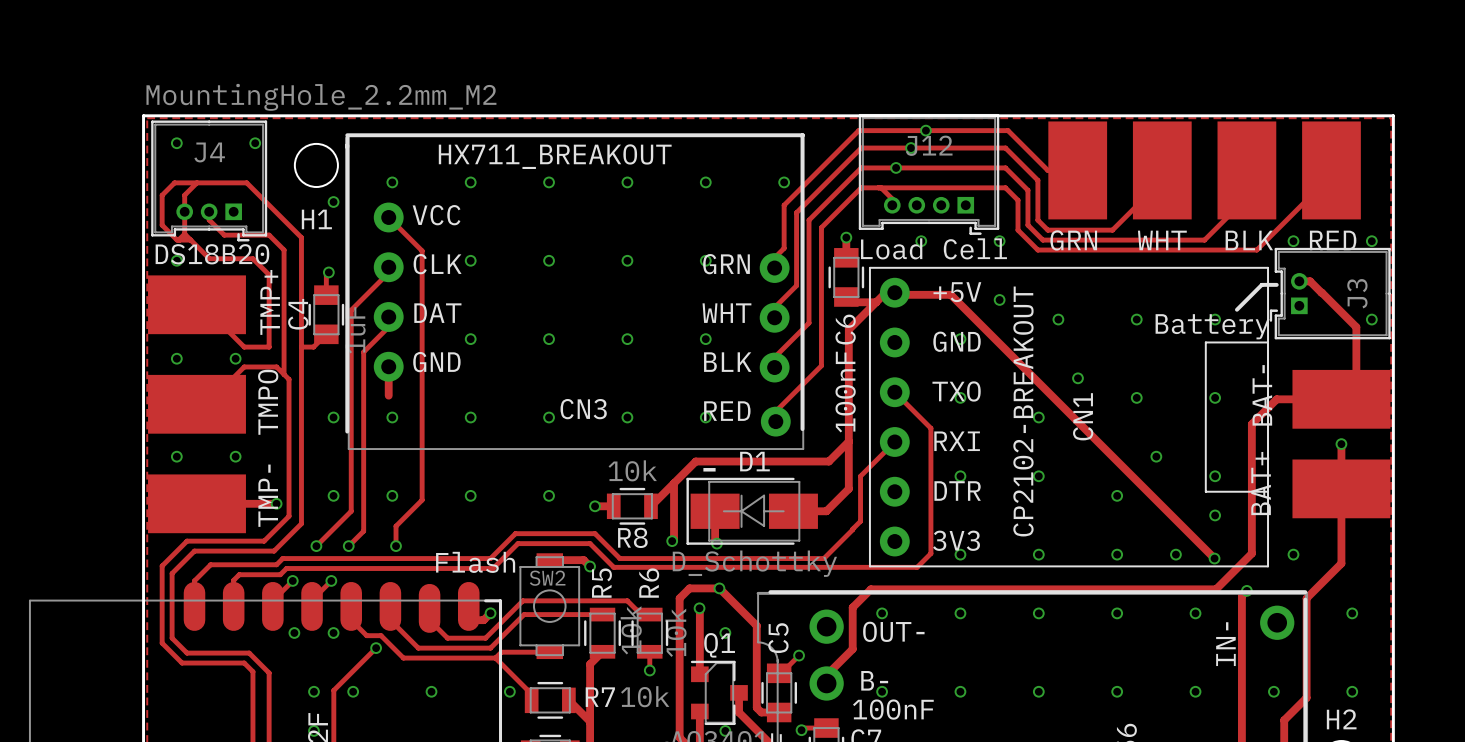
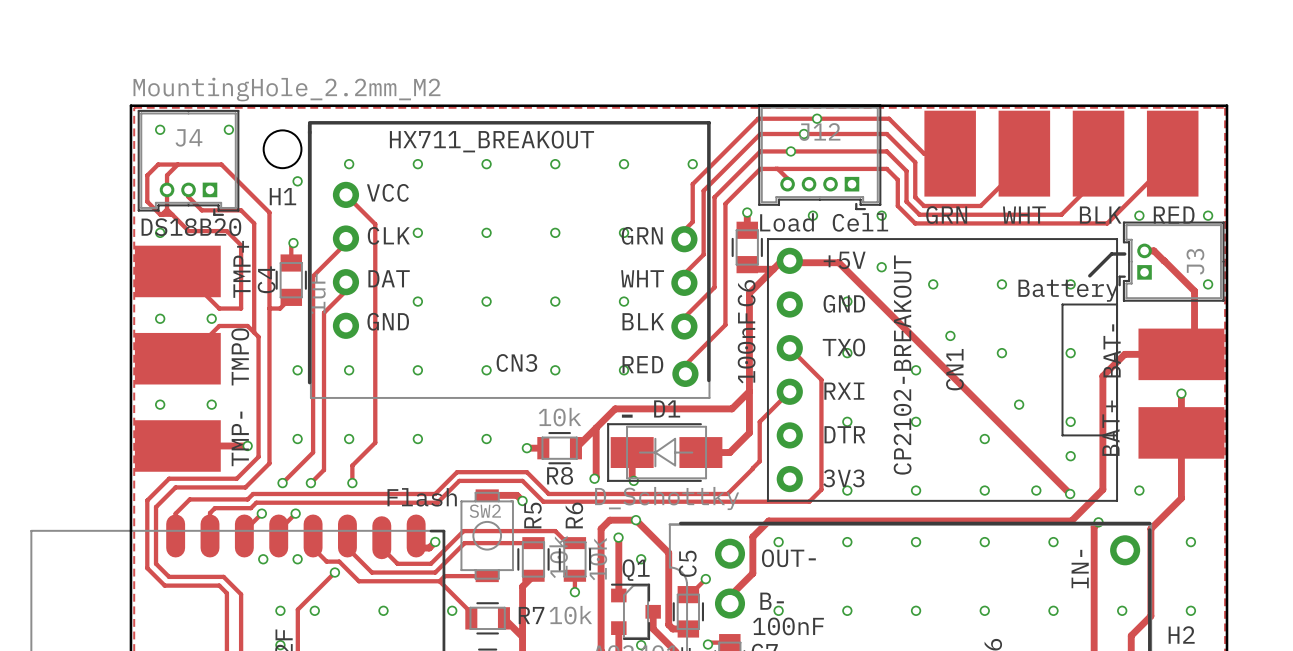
track: (388, 366) (388, 395) -> none

